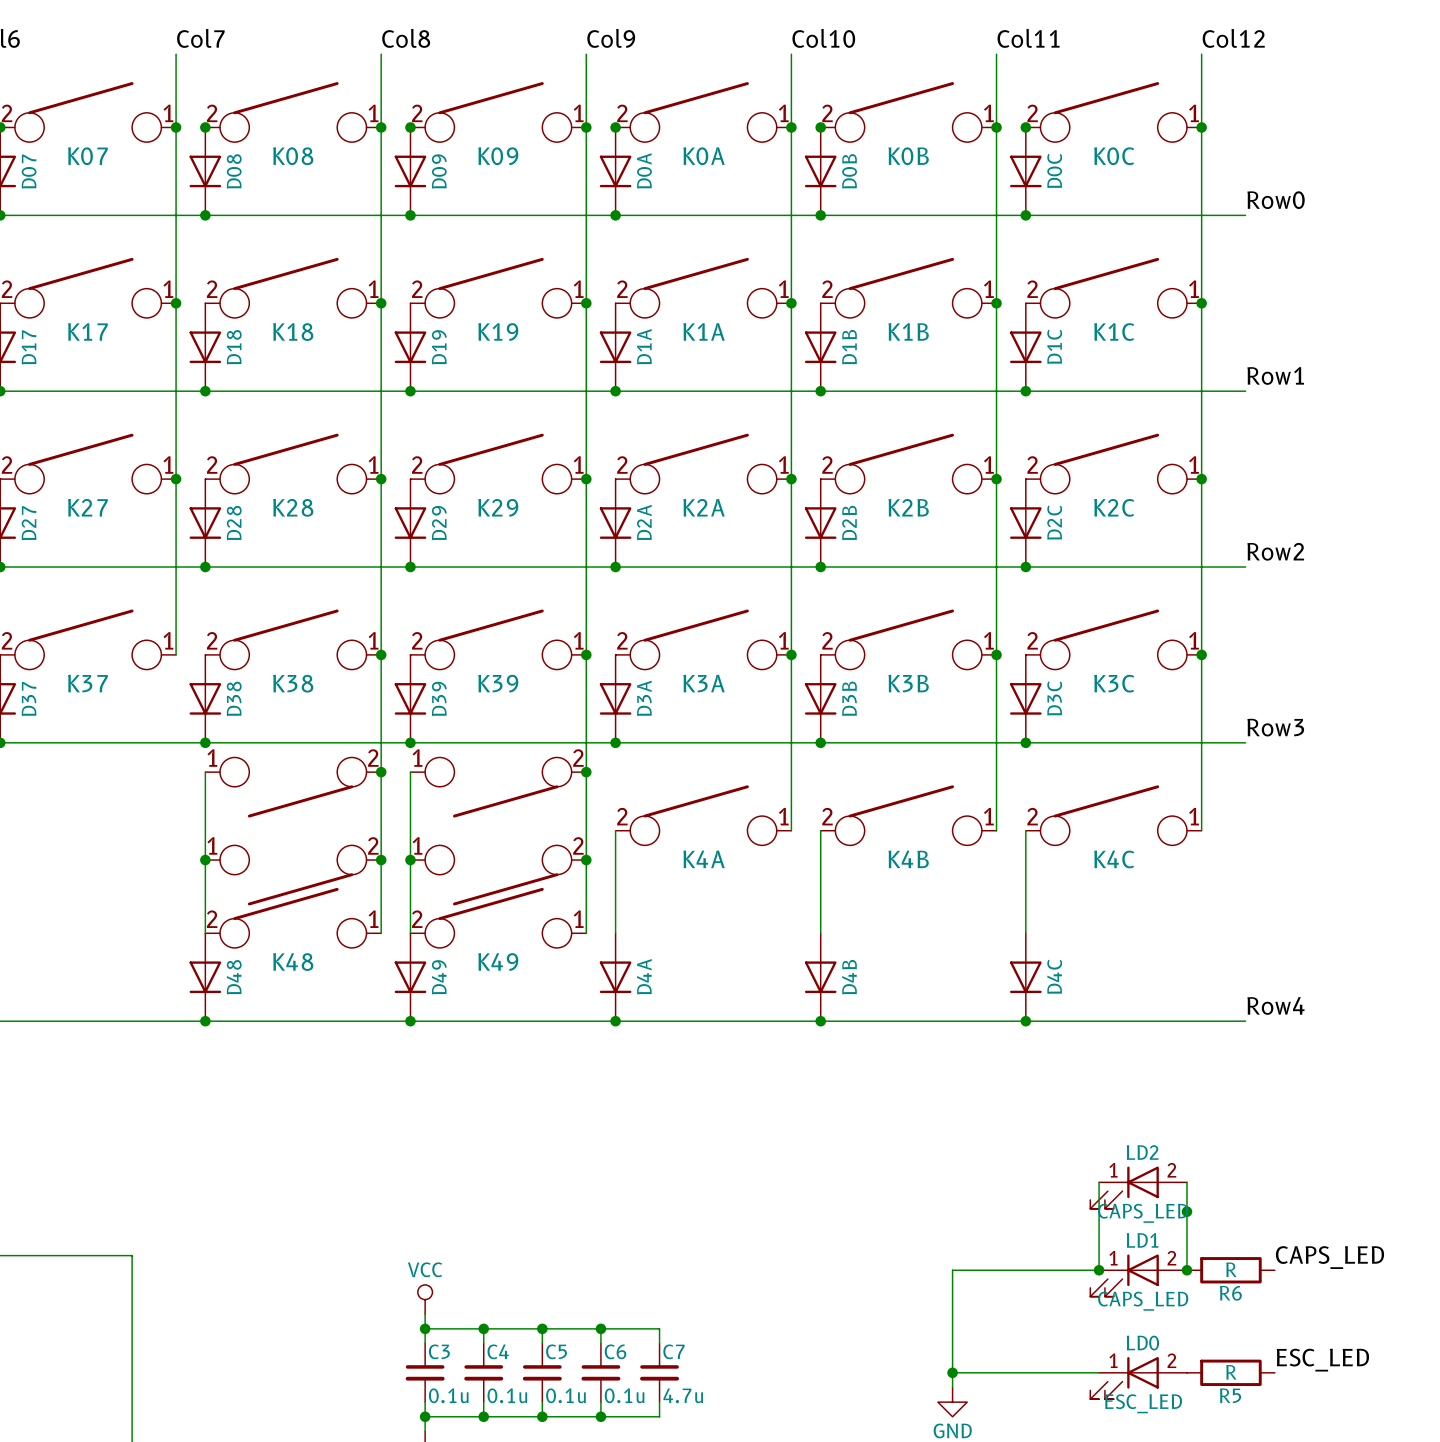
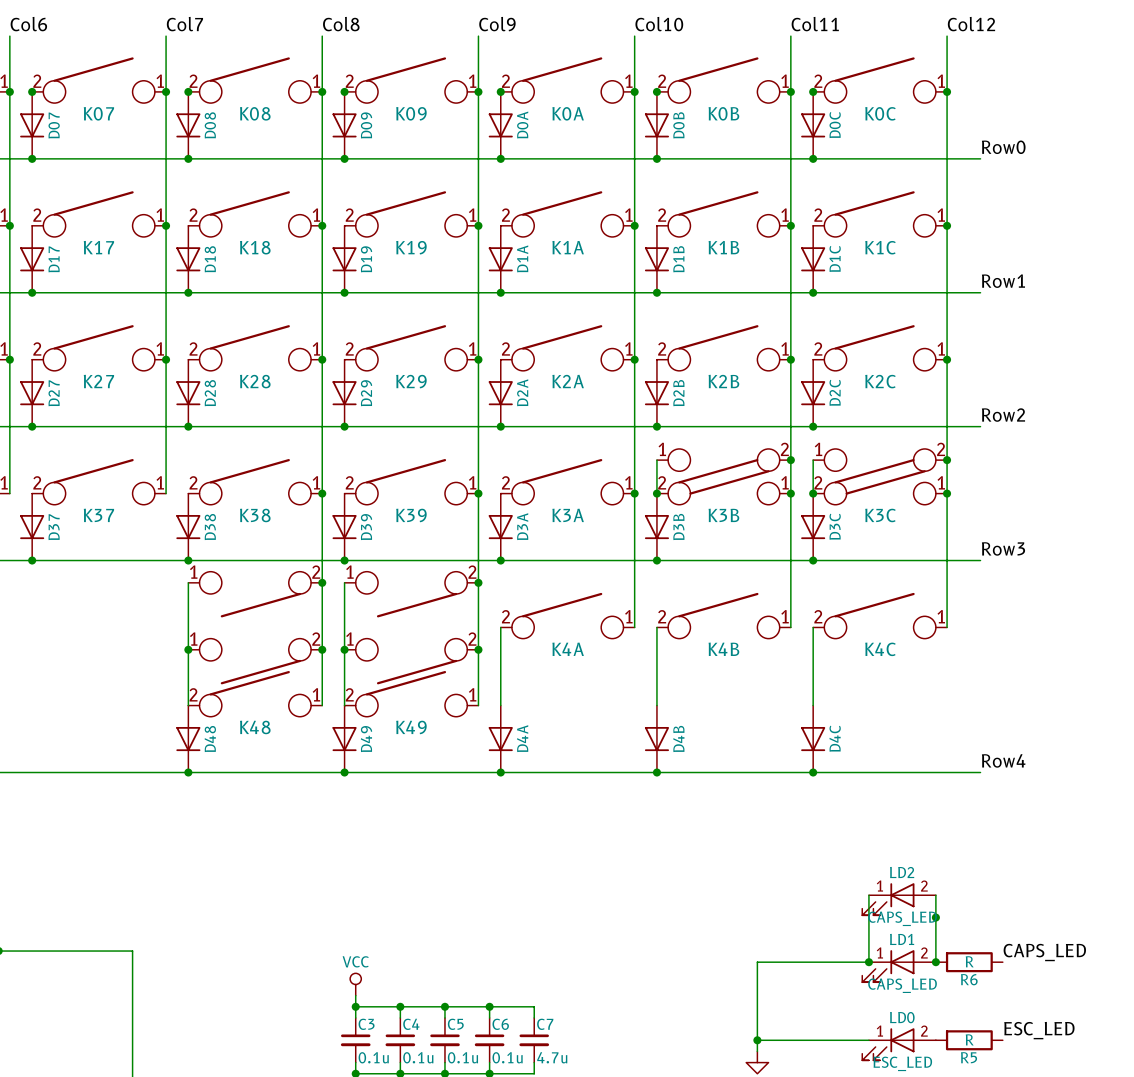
wire: none -> (656, 460) (656, 493)
junction: none -> (790, 460)
wire: none -> (813, 460) (813, 493)
junction: none -> (947, 460)
part: none -> (723, 471)
part: none -> (880, 471)
junction: none -> (656, 493)
junction: none -> (813, 493)

